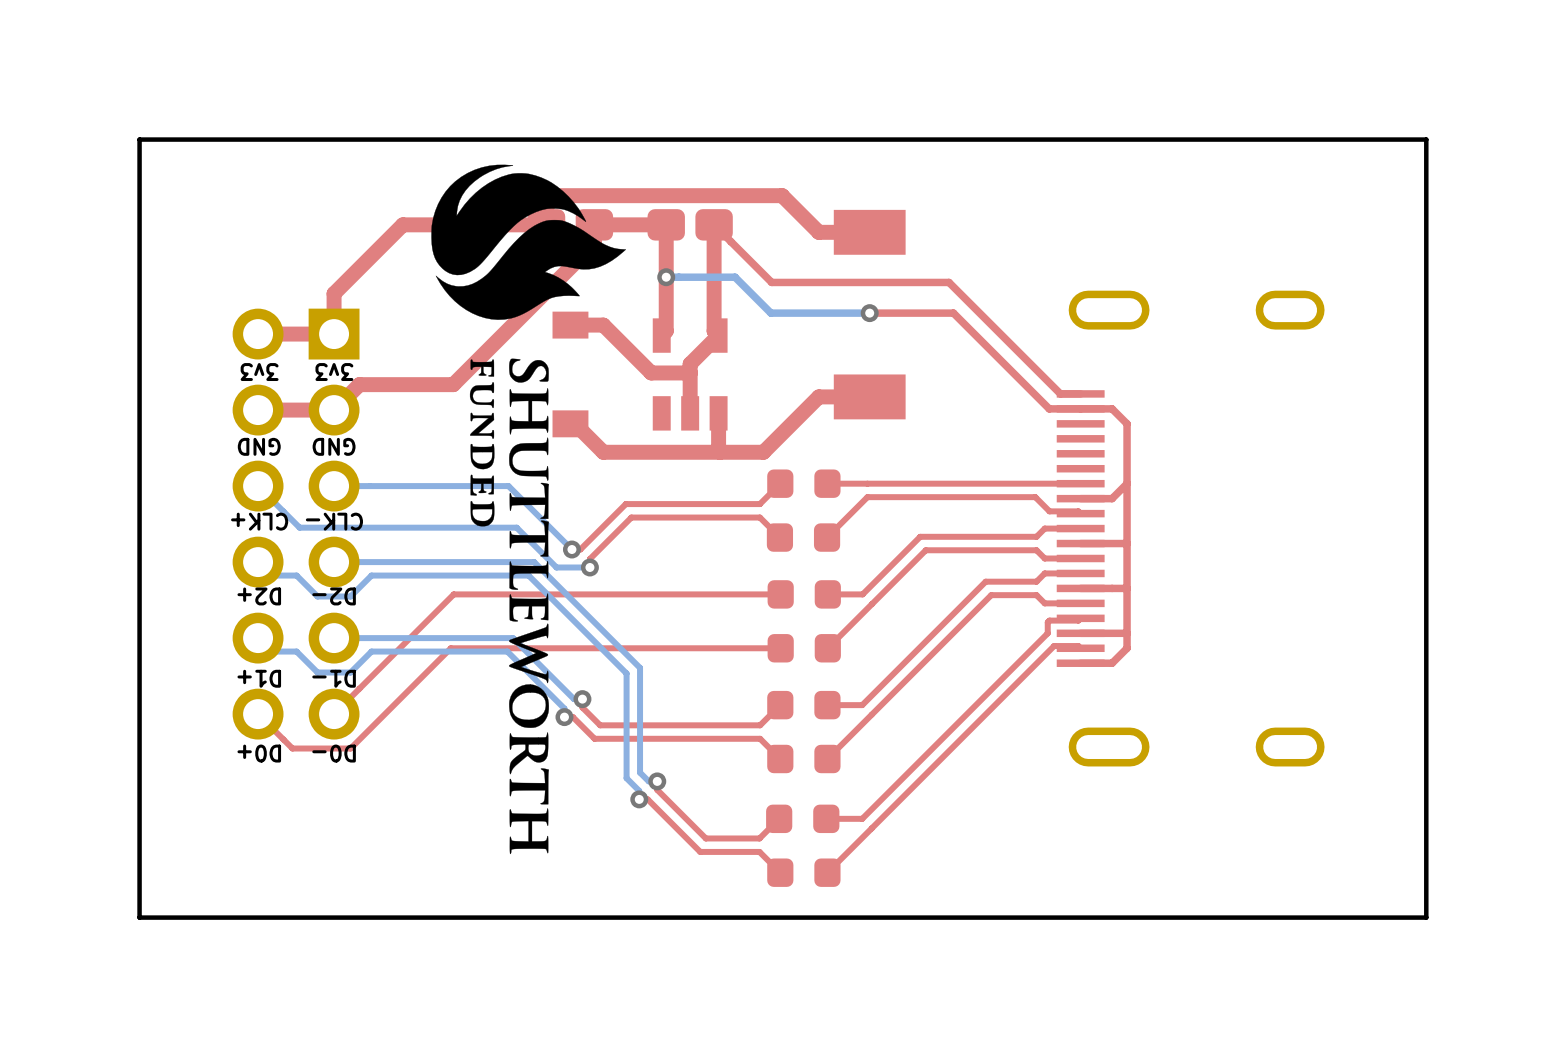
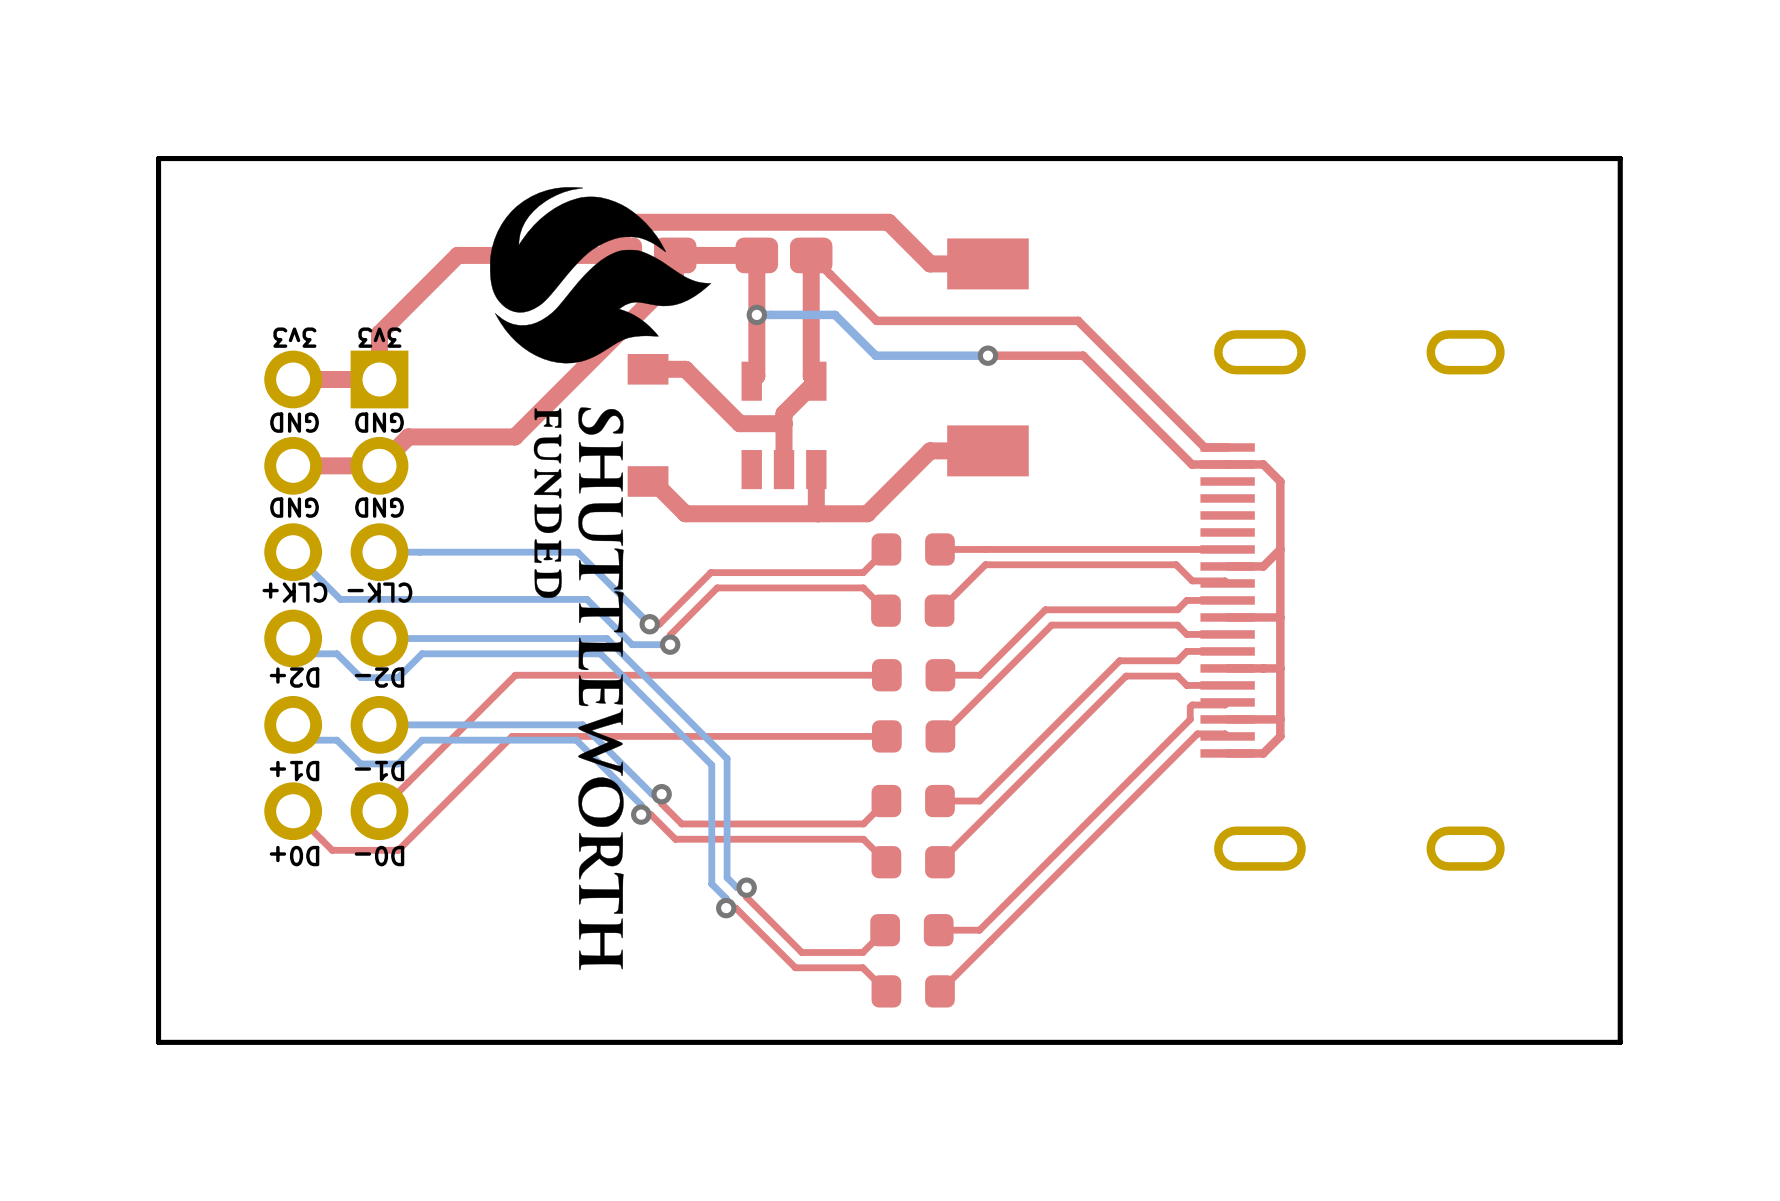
text: none -> 3v3 (294, 337)
text: none -> 3v3 (379, 337)
text: 3v3 (259, 372) -> GND (294, 422)
text: 3v3 (334, 372) -> GND (379, 422)

